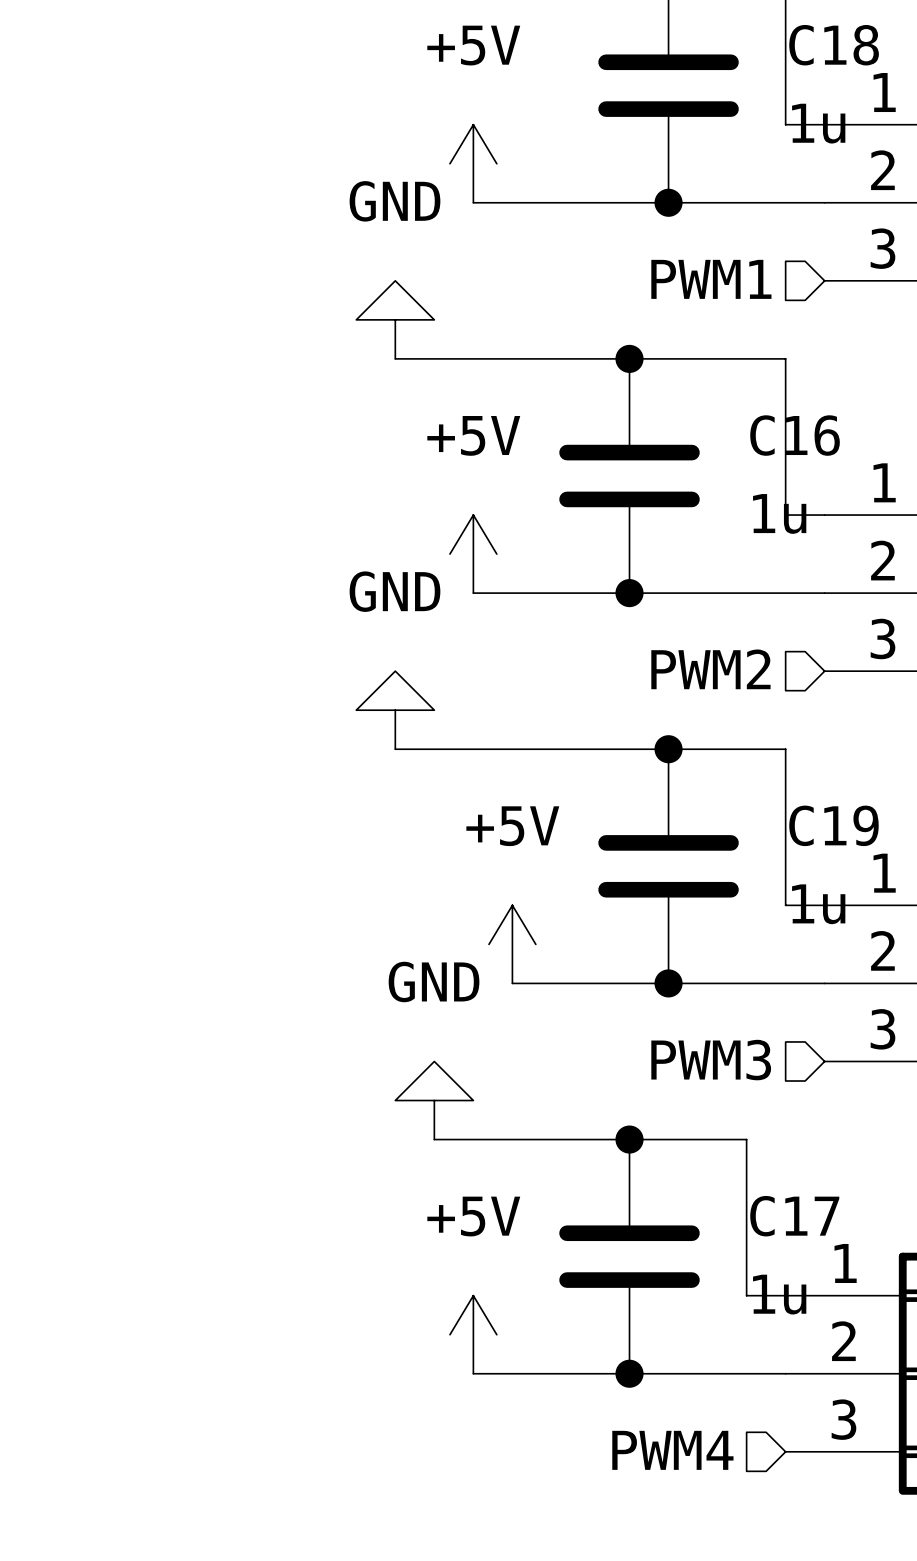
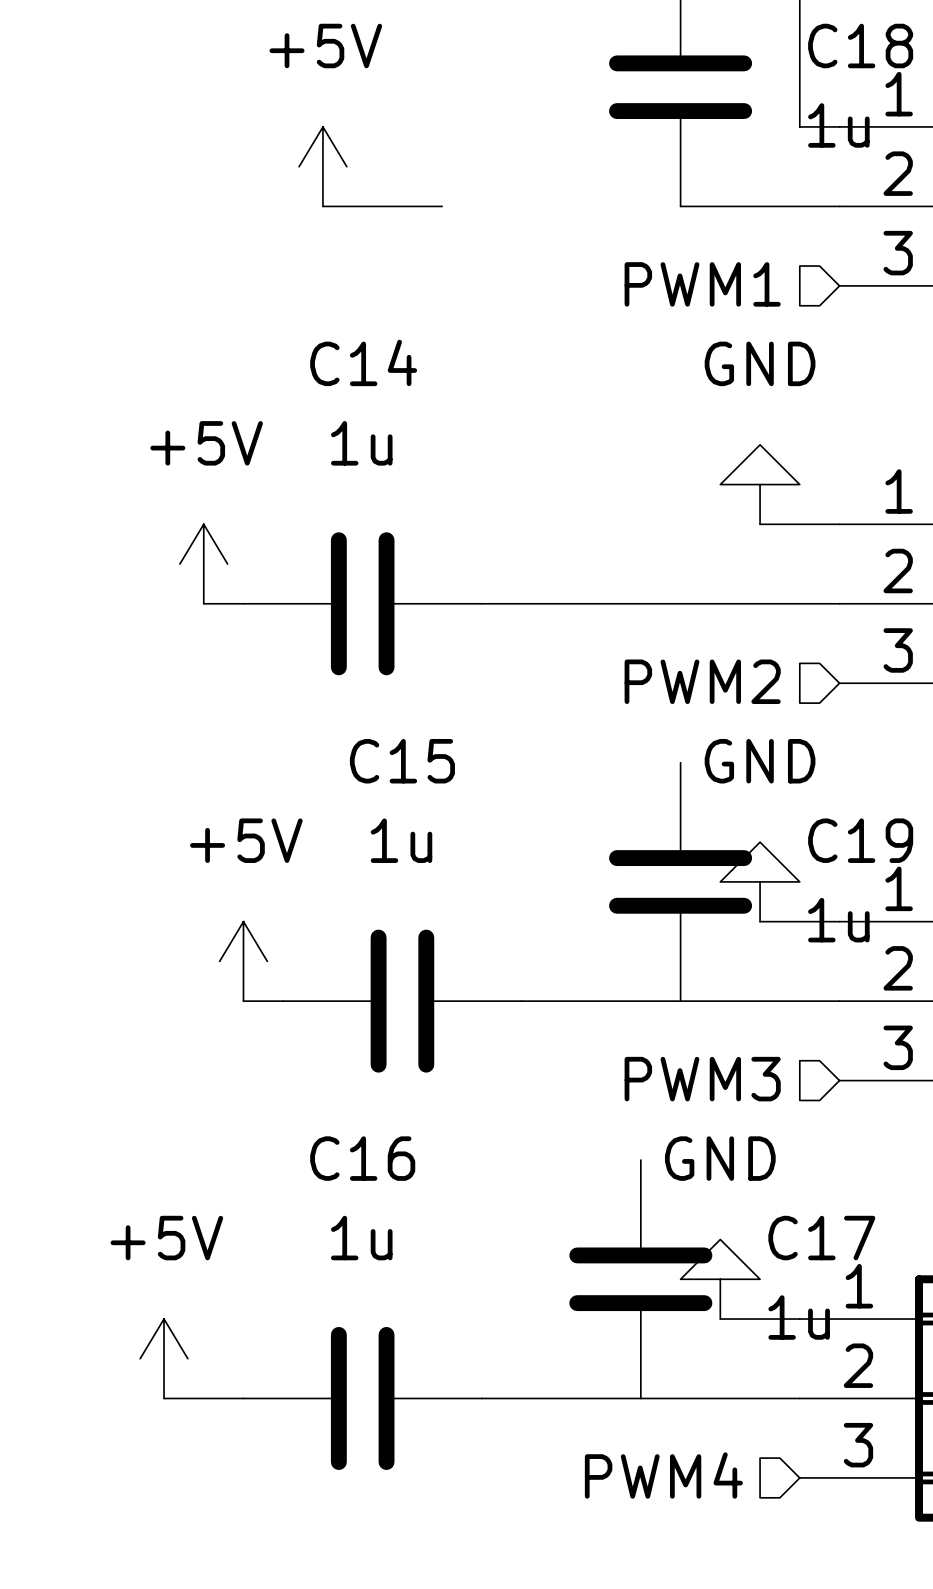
power symbol position: +5V (473, 163) -> +5V (322, 166)
wire: none -> (322, 206) (442, 206)
wire: (473, 202) (668, 202) -> none
junction: (668, 202) -> none
power symbol: GND (395, 319) -> none
wire: (395, 358) (785, 358) (785, 515) -> (760, 524) (799, 524)
junction: (629, 358) -> none
C16 name position: C16 (795, 435) -> C16 (362, 1158)
C16 rotation: 0° (629, 476) -> 90° clockwise (362, 1398)
C16 position: (629, 476) -> (362, 1398)
power symbol: none -> GND (760, 484)
C16 value position: 1u (779, 513) -> 1u (361, 1238)
power symbol: none -> +5V (203, 564)
power symbol: +5V (473, 554) -> none
wire: none -> (203, 603) (243, 603)
C14: none -> 1u (362, 603)
junction: (629, 593) -> none
power symbol: GND (395, 710) -> none
wire: (395, 749) (785, 749) (785, 905) -> (760, 921) (799, 921)
junction: (668, 749) -> none
power symbol: none -> GND (760, 881)
power symbol: none -> +5V (243, 961)
power symbol: +5V (512, 944) -> none
wire: none -> (243, 1001) (283, 1001)
C15: none -> 1u (402, 1001)
junction: (668, 983) -> none
power symbol: GND (434, 1100) -> none
wire: (434, 1139) (746, 1139) (746, 1295) -> (720, 1319) (760, 1319)
junction: (629, 1139) -> none
power symbol: none -> GND (720, 1279)
power symbol: none -> +5V (164, 1358)
power symbol: +5V (473, 1334) -> none
wire: none -> (164, 1398) (243, 1398)
junction: (629, 1373) -> none

